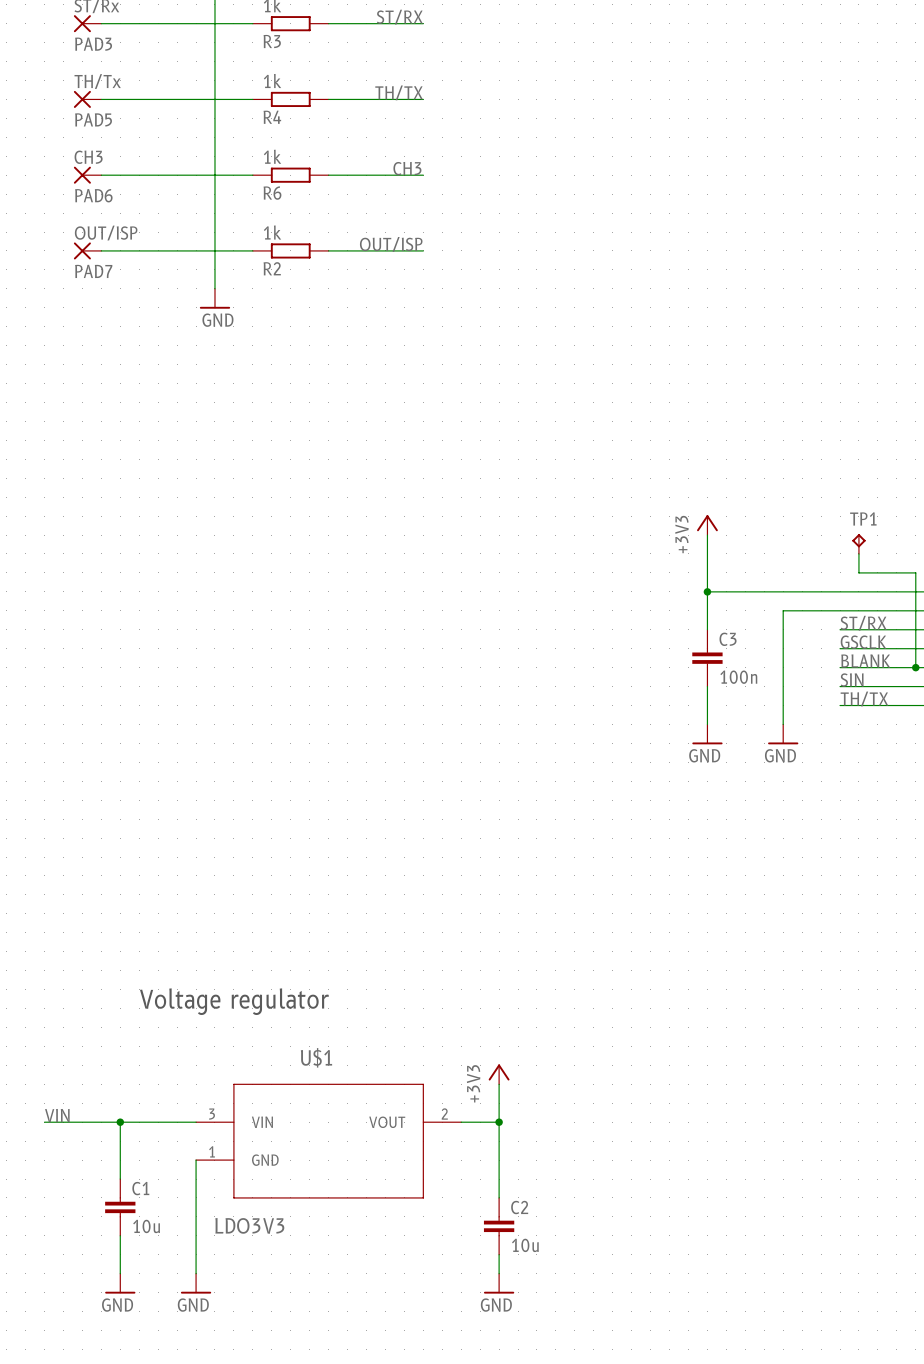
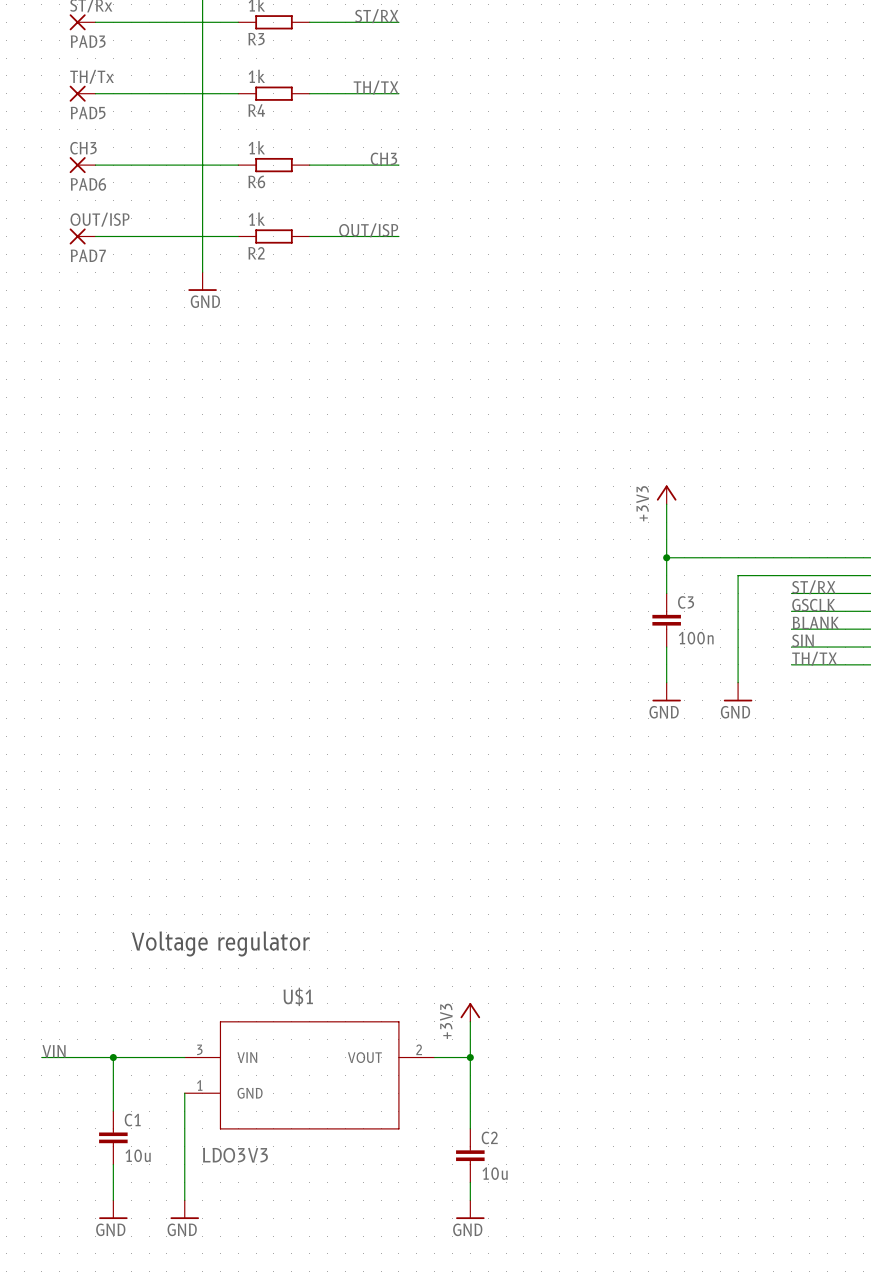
TP1: (858, 544) -> none
wire: (858, 553) (858, 572) (915, 572) (915, 667) -> none
junction: (915, 667) -> none

